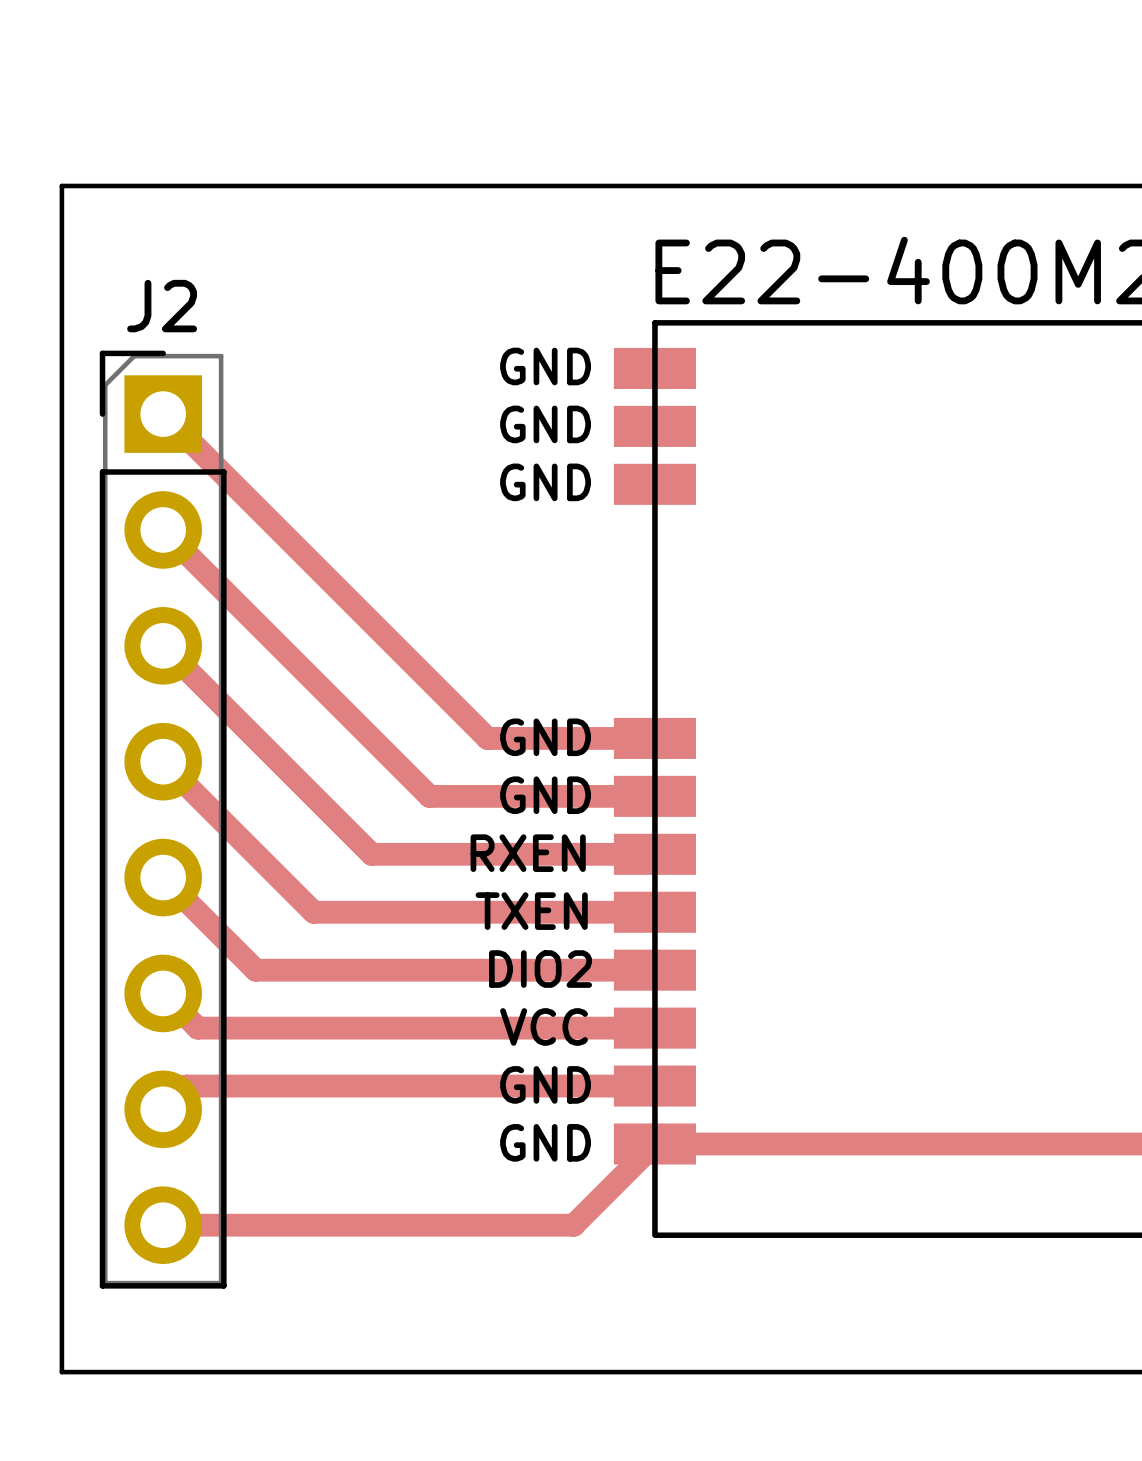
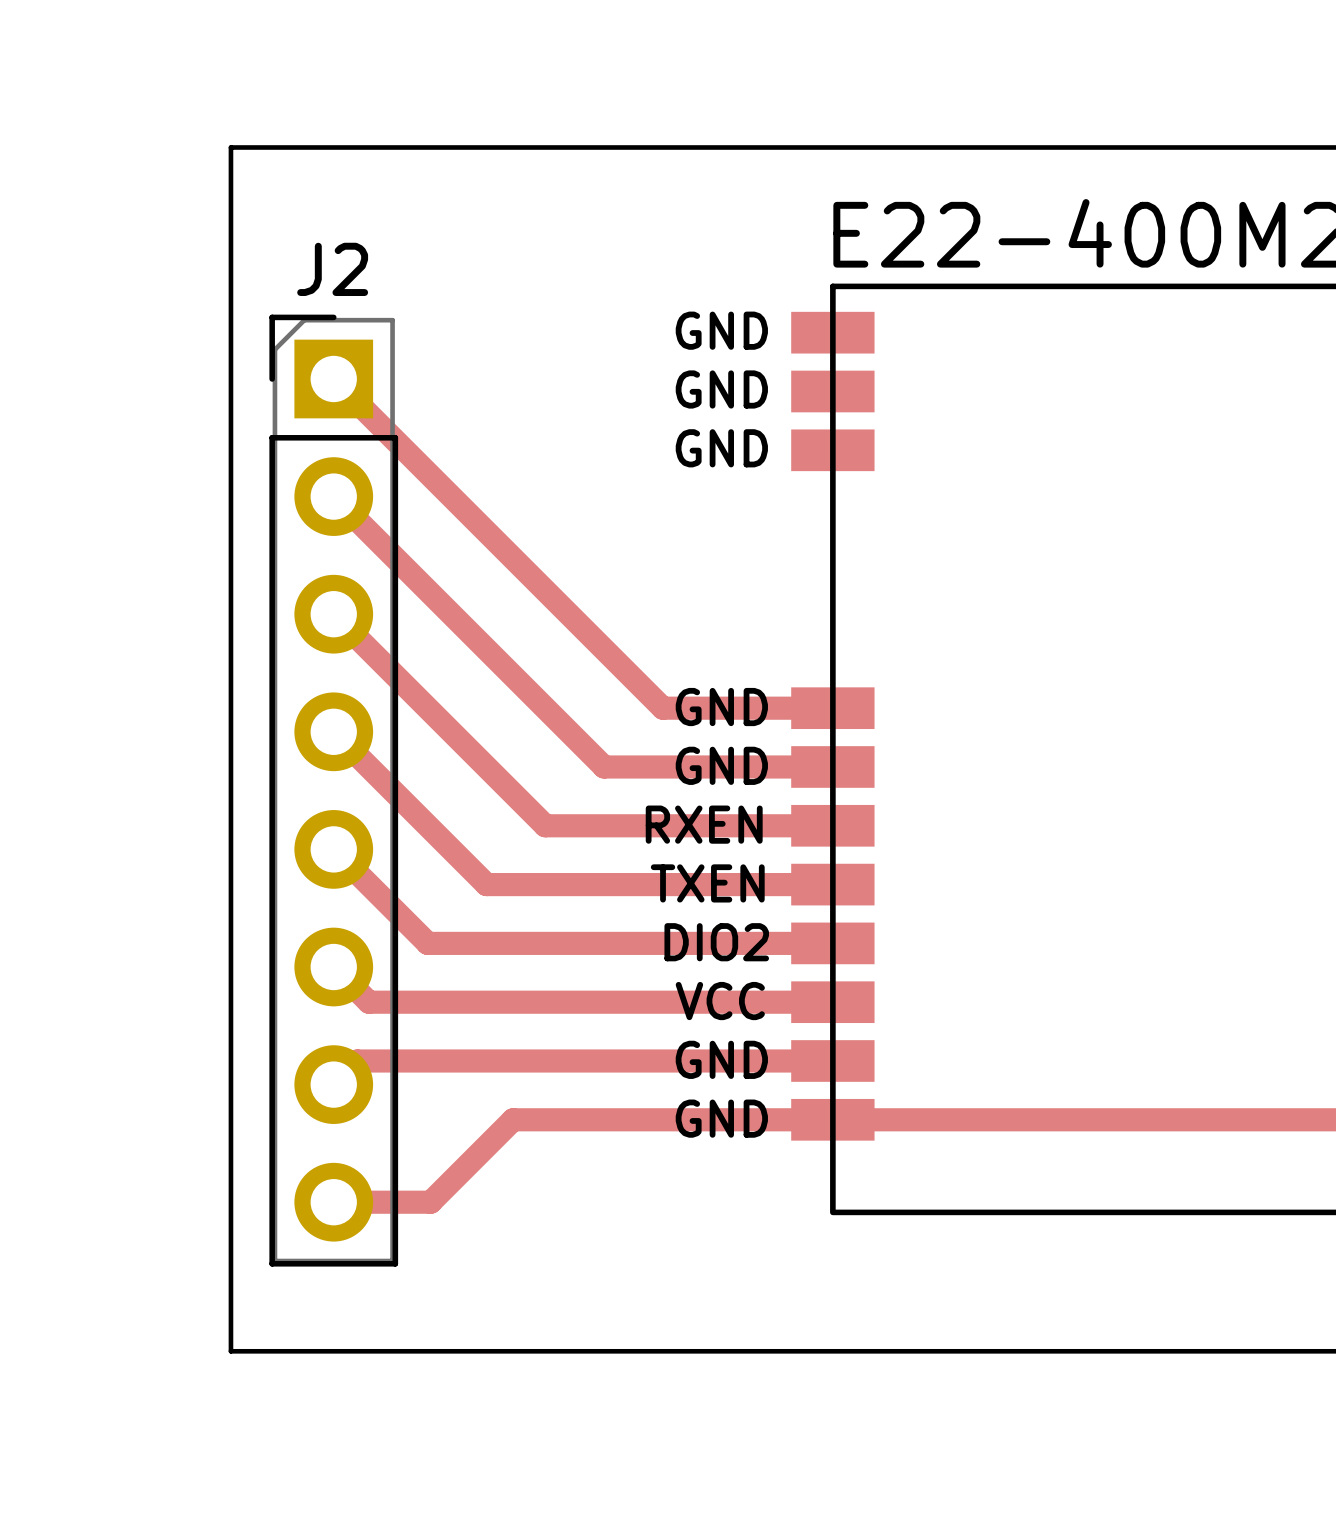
track: (654, 1143) (573, 1225) (258, 1225) -> (832, 1119) (513, 1119) (430, 1202)

